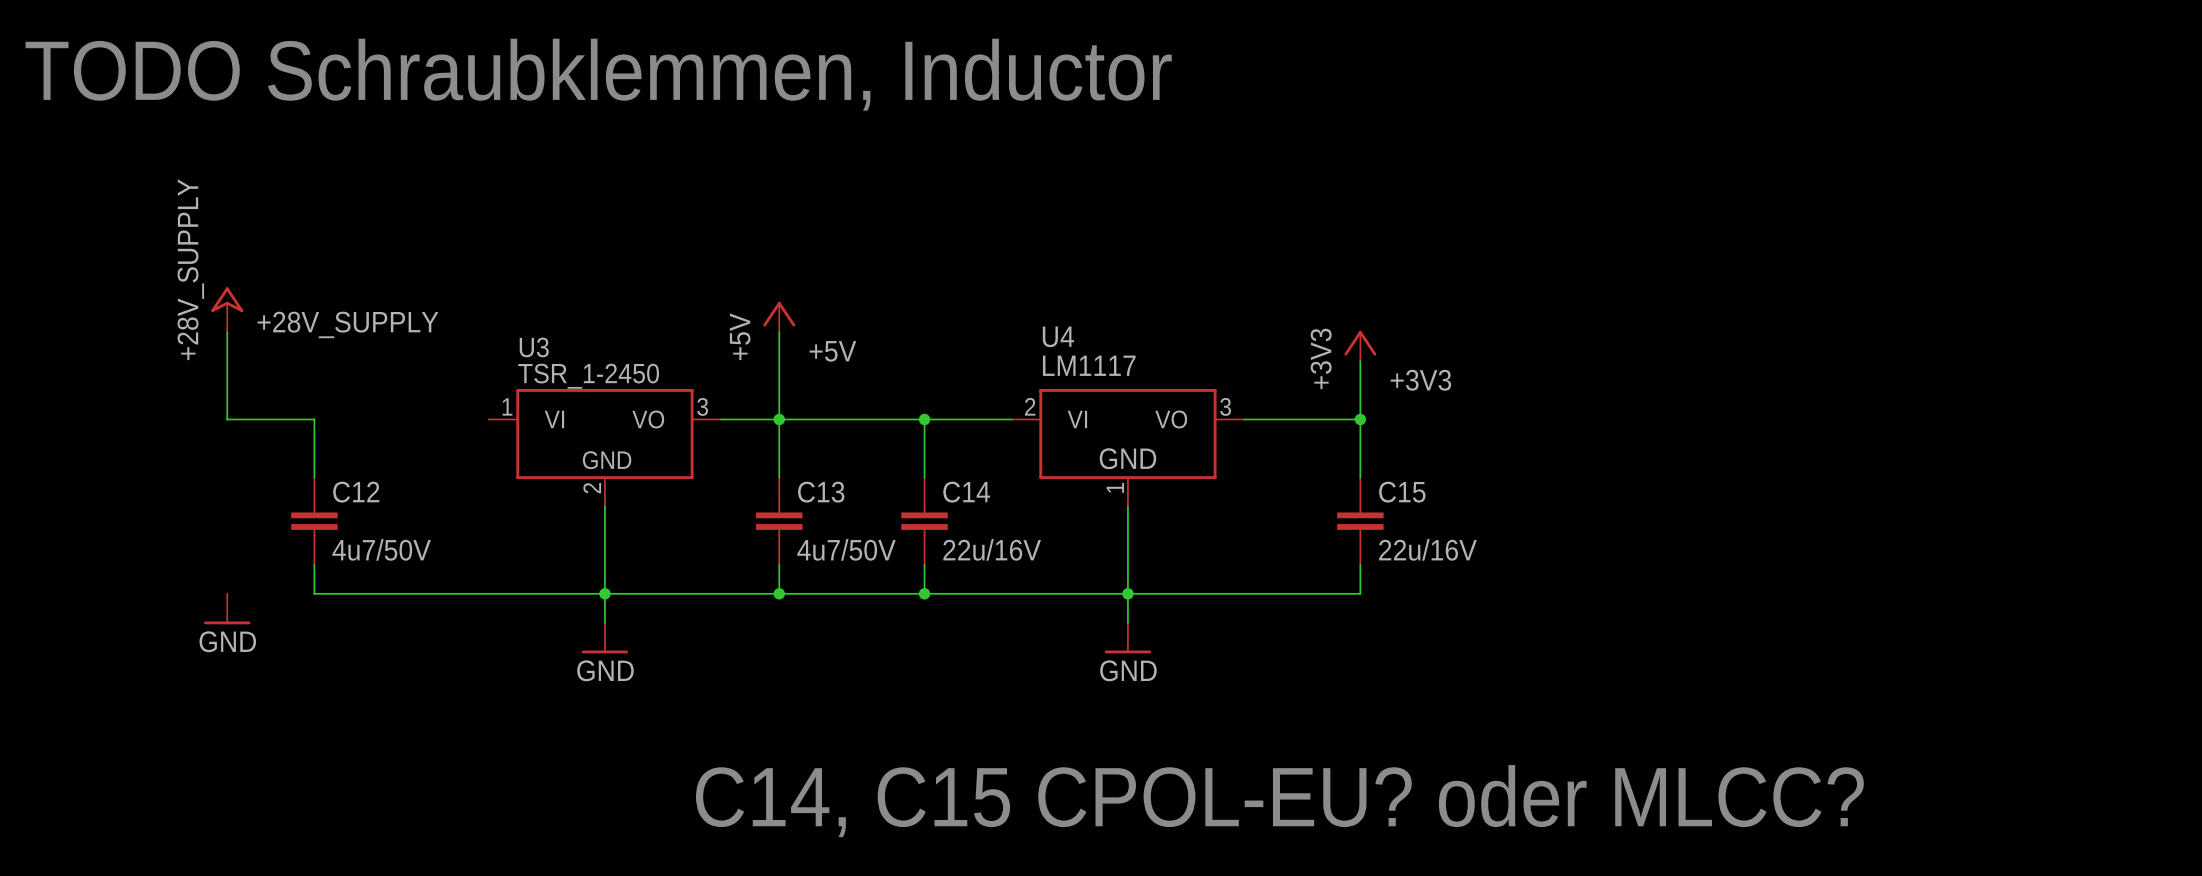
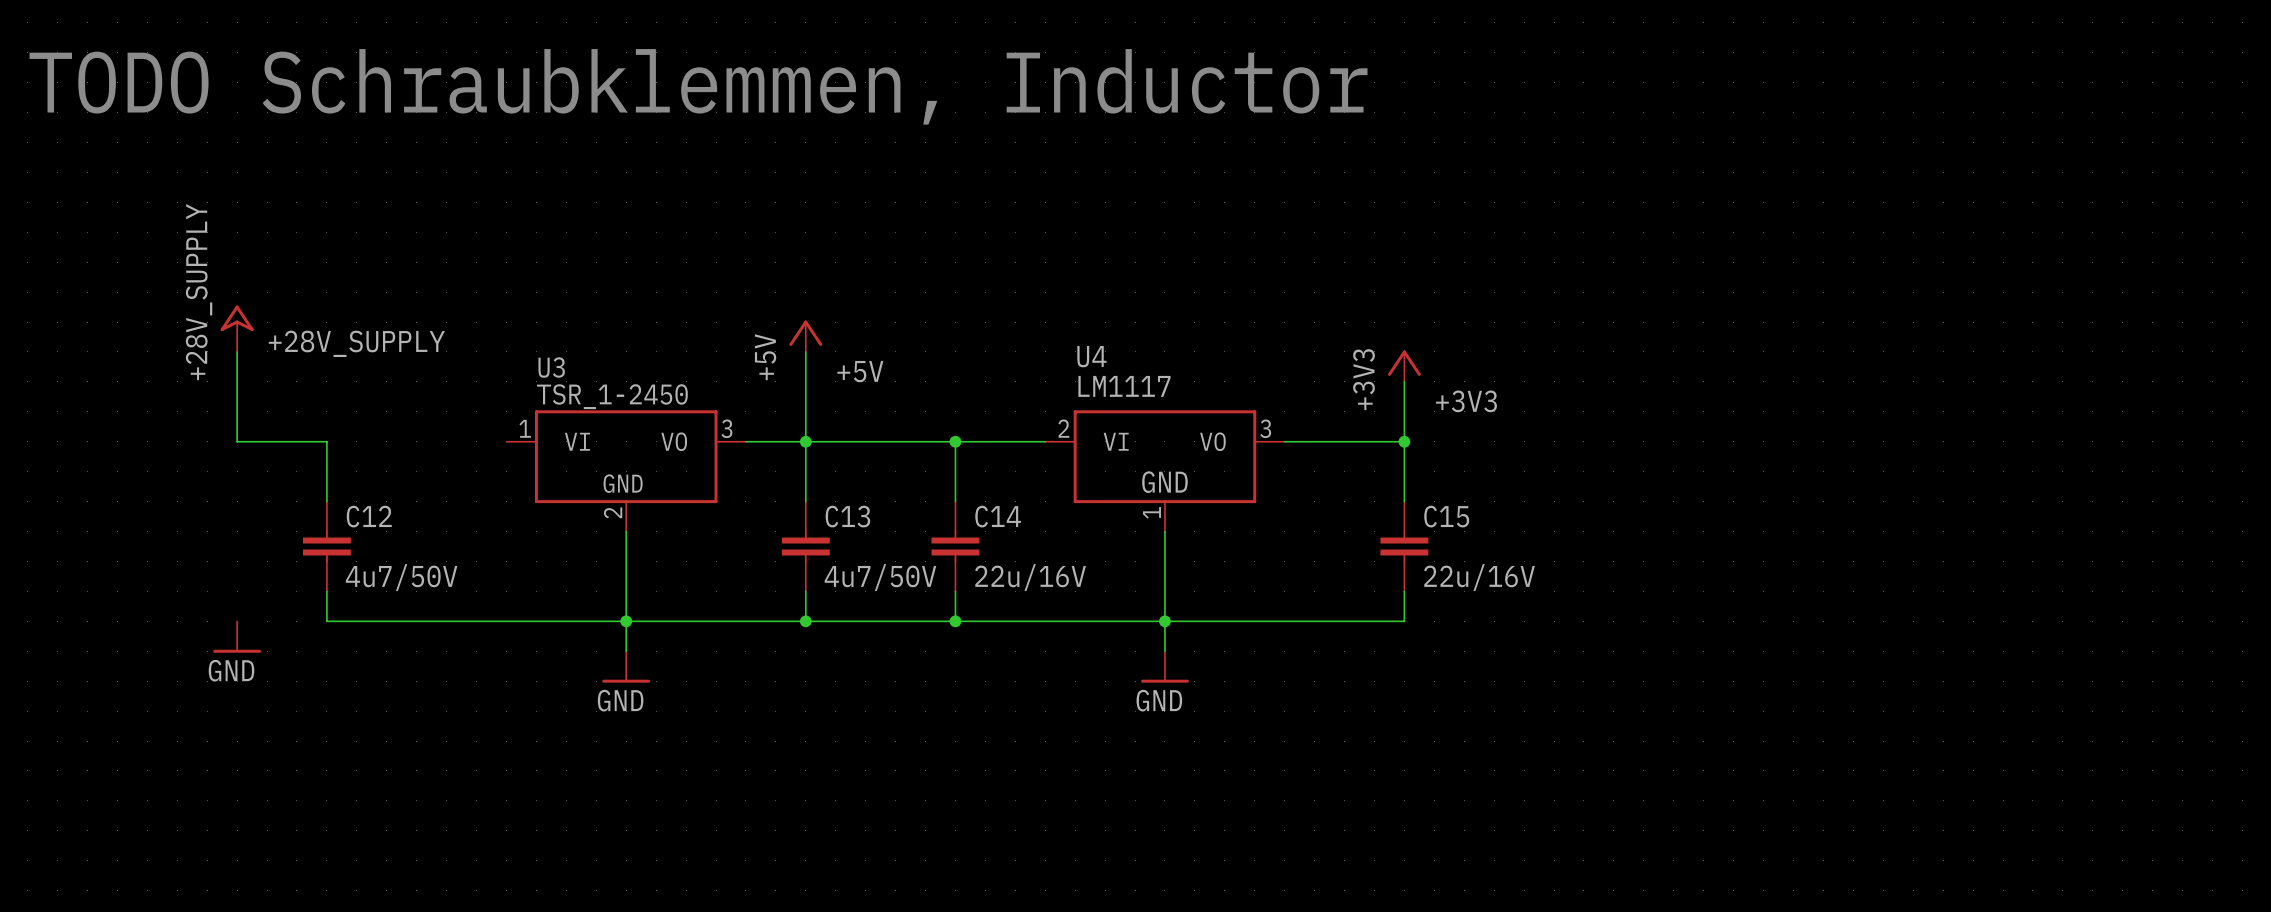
text: C14, C15 CPOL-EU? oder MLCC? (1279, 801) -> none

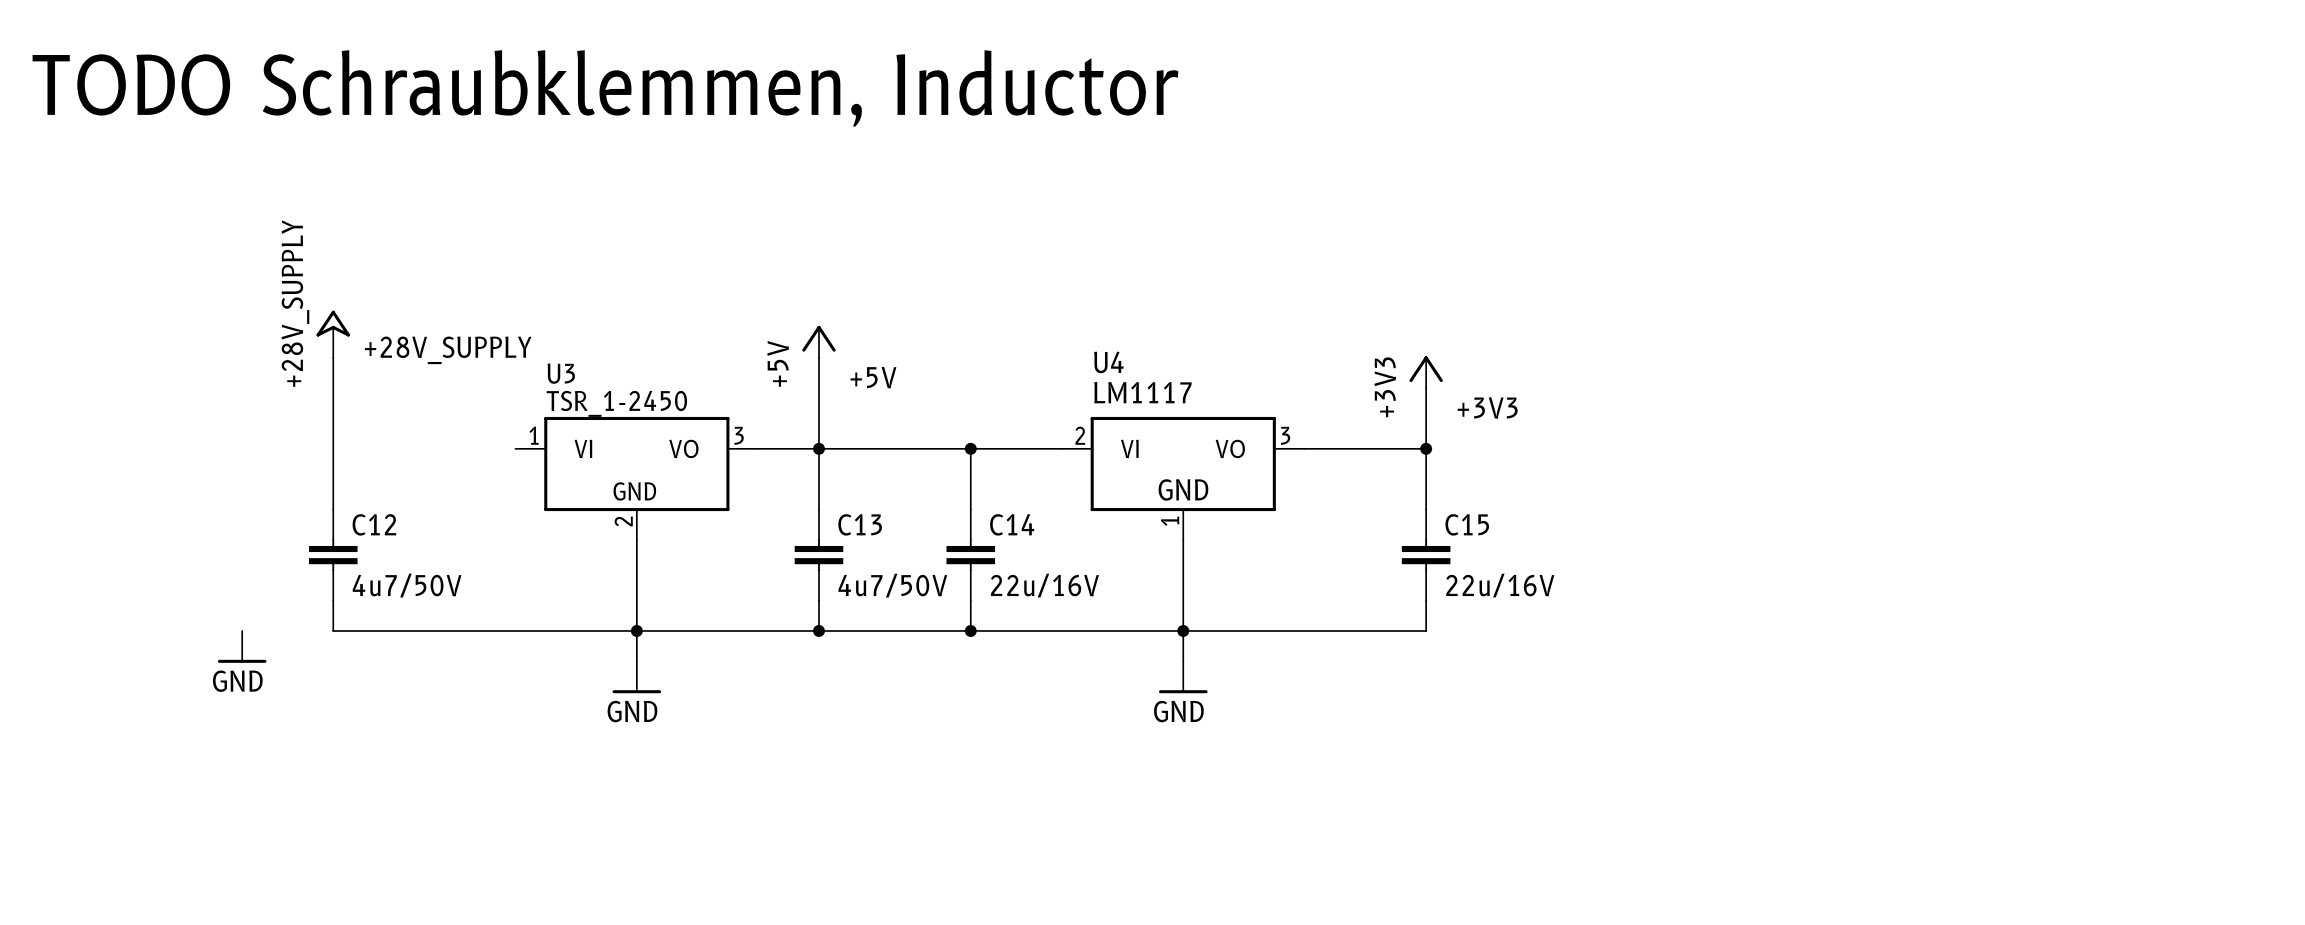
power symbol position: +28V_SUPPLY (237, 328) -> +28V_SUPPLY (333, 334)
label position: +28V_SUPPLY (356, 343) -> +28V_SUPPLY (448, 350)
wire: (237, 351) (237, 441) (326, 441) -> (333, 357) (333, 448)

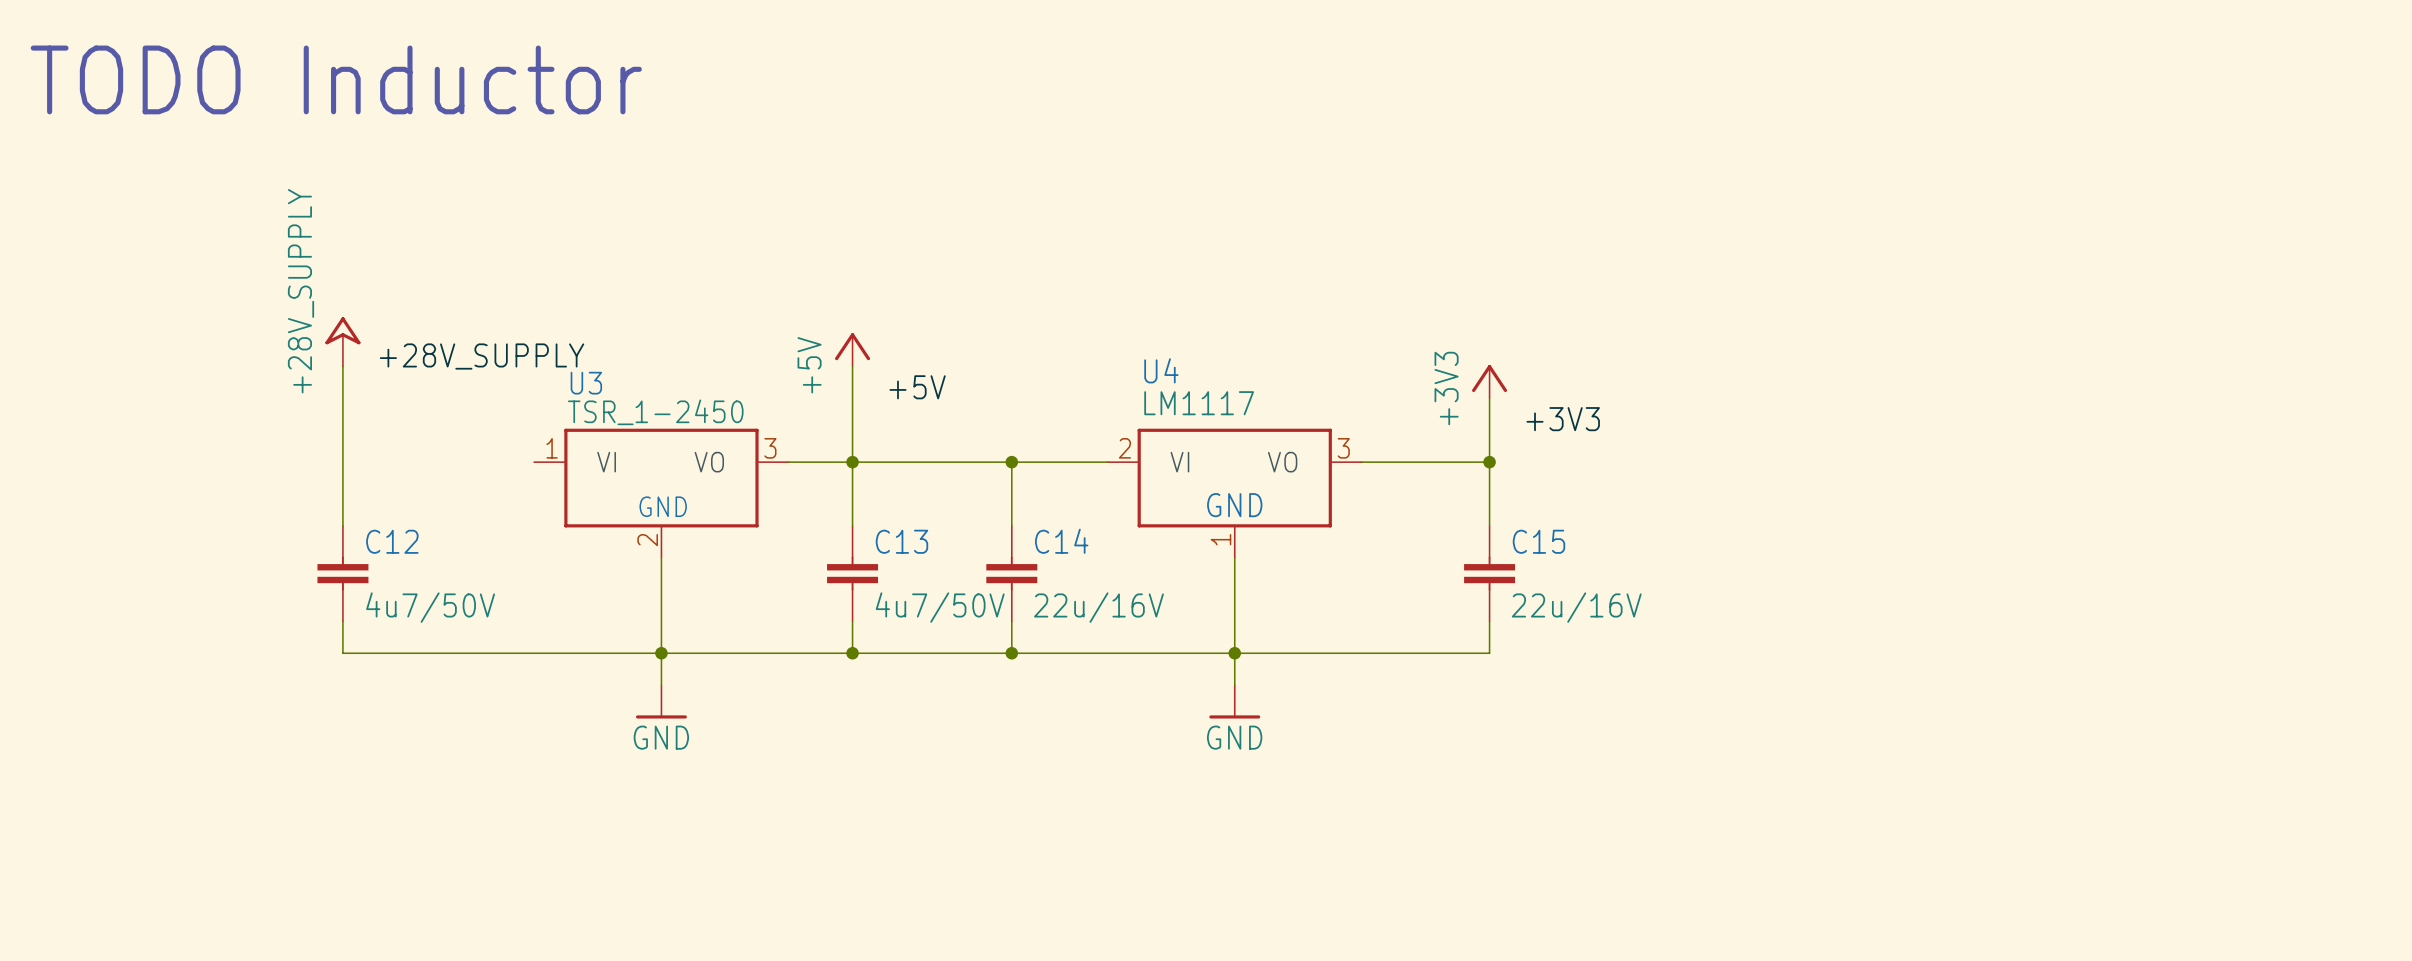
text: TODO Schraubklemmen, Inductor (605, 88) -> TODO Inductor (336, 79)
power symbol: GND (242, 646) -> none

